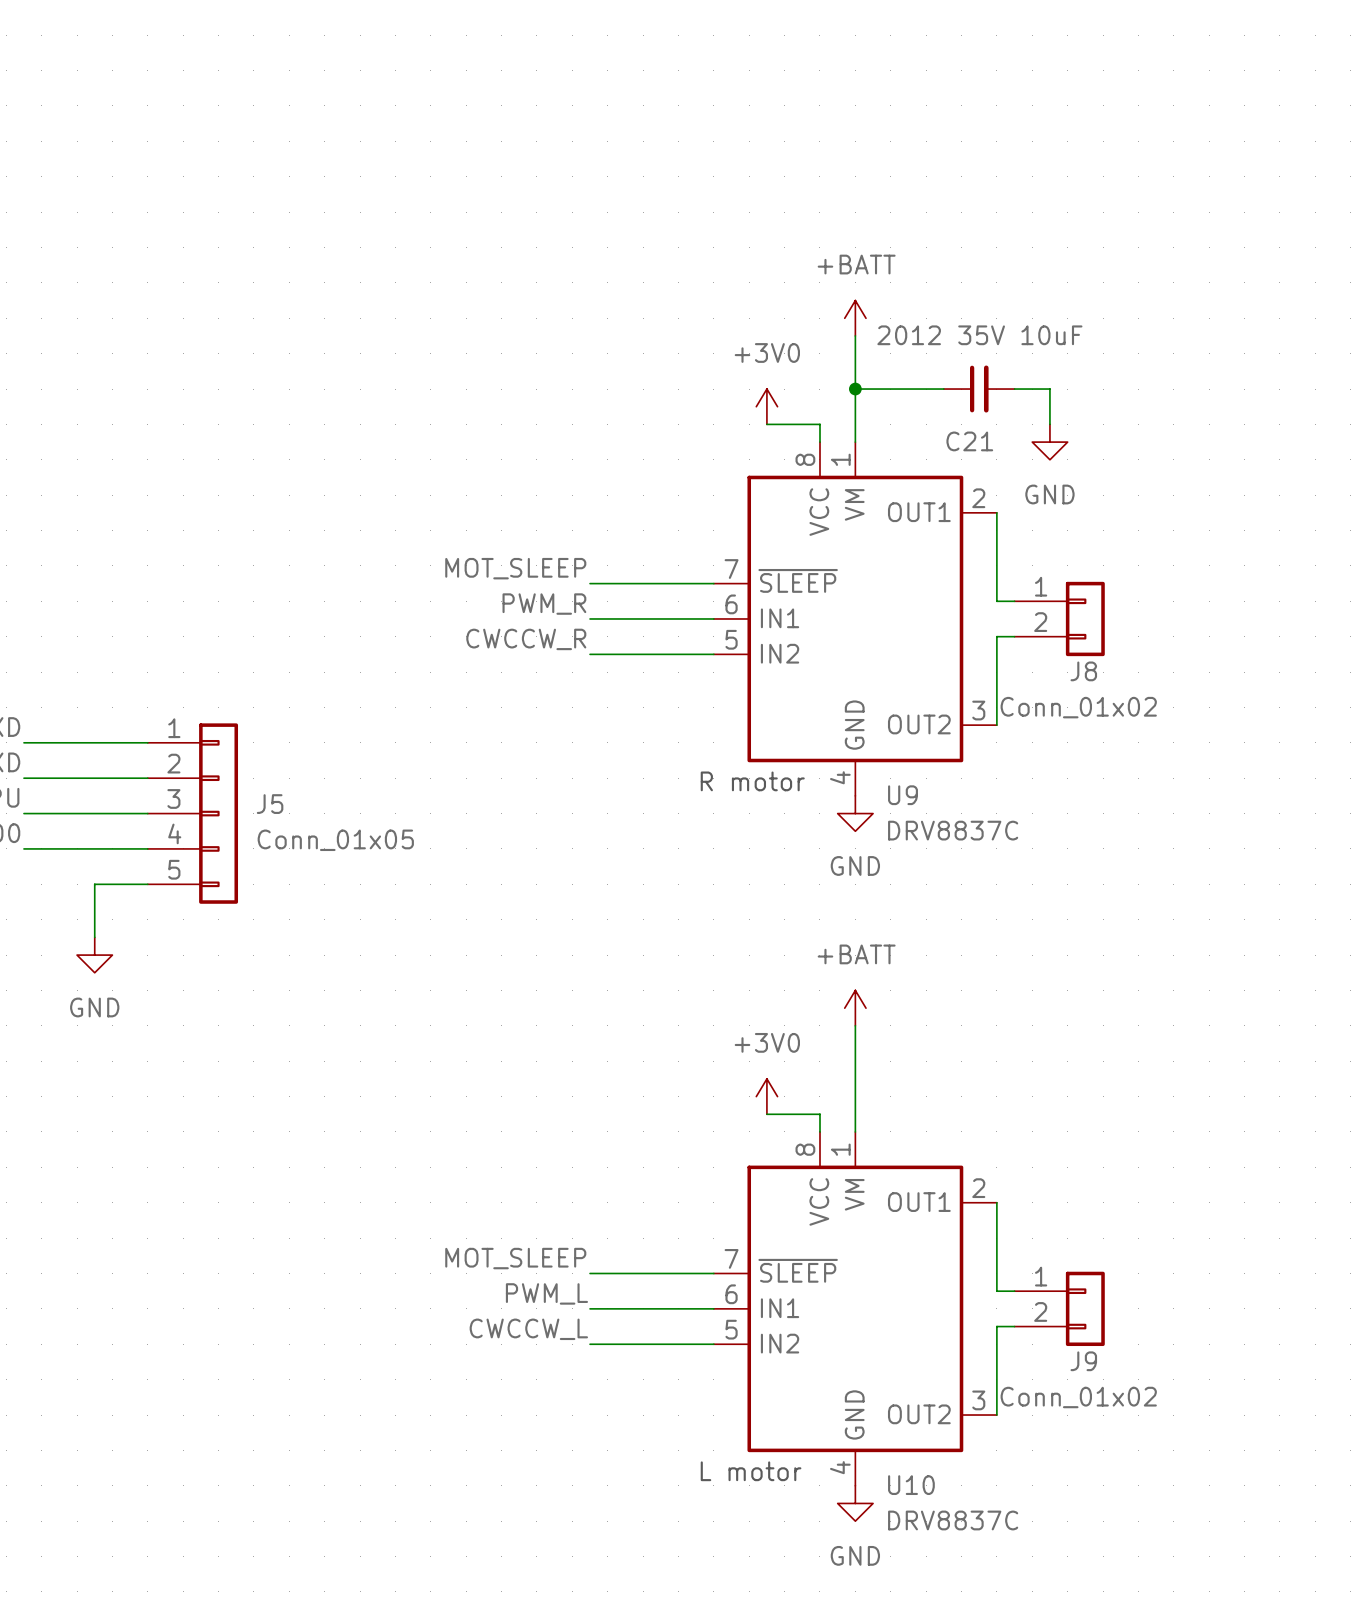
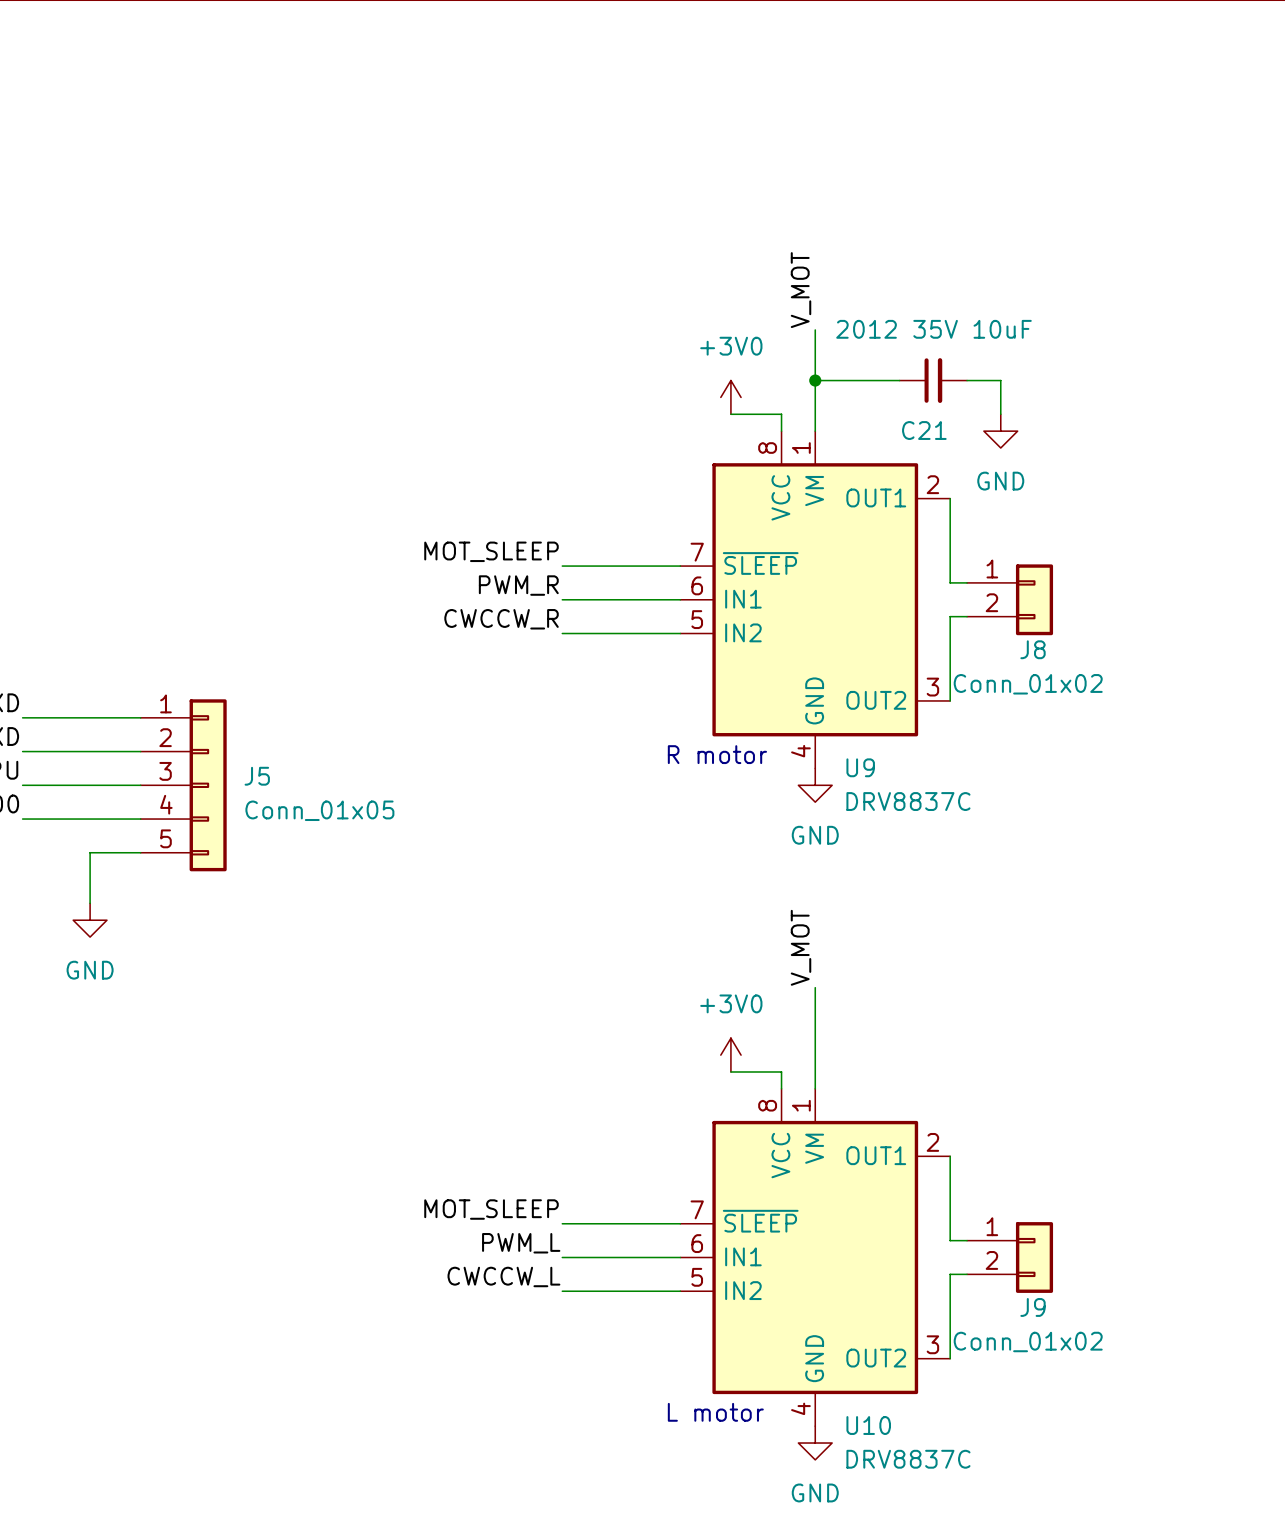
label: none -> V_MOT (801, 290)
power symbol: +BATT (855, 318) -> none
label: none -> V_MOT (801, 947)
power symbol: +BATT (855, 1008) -> none

